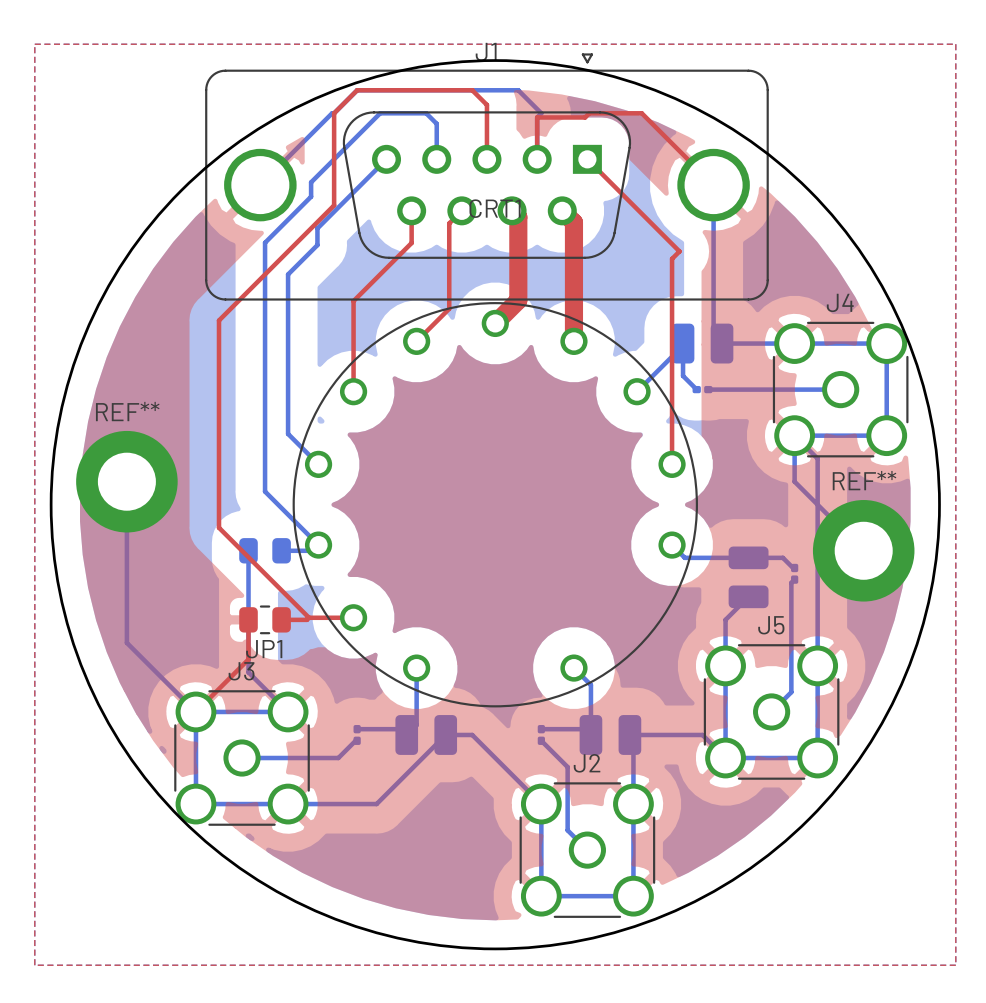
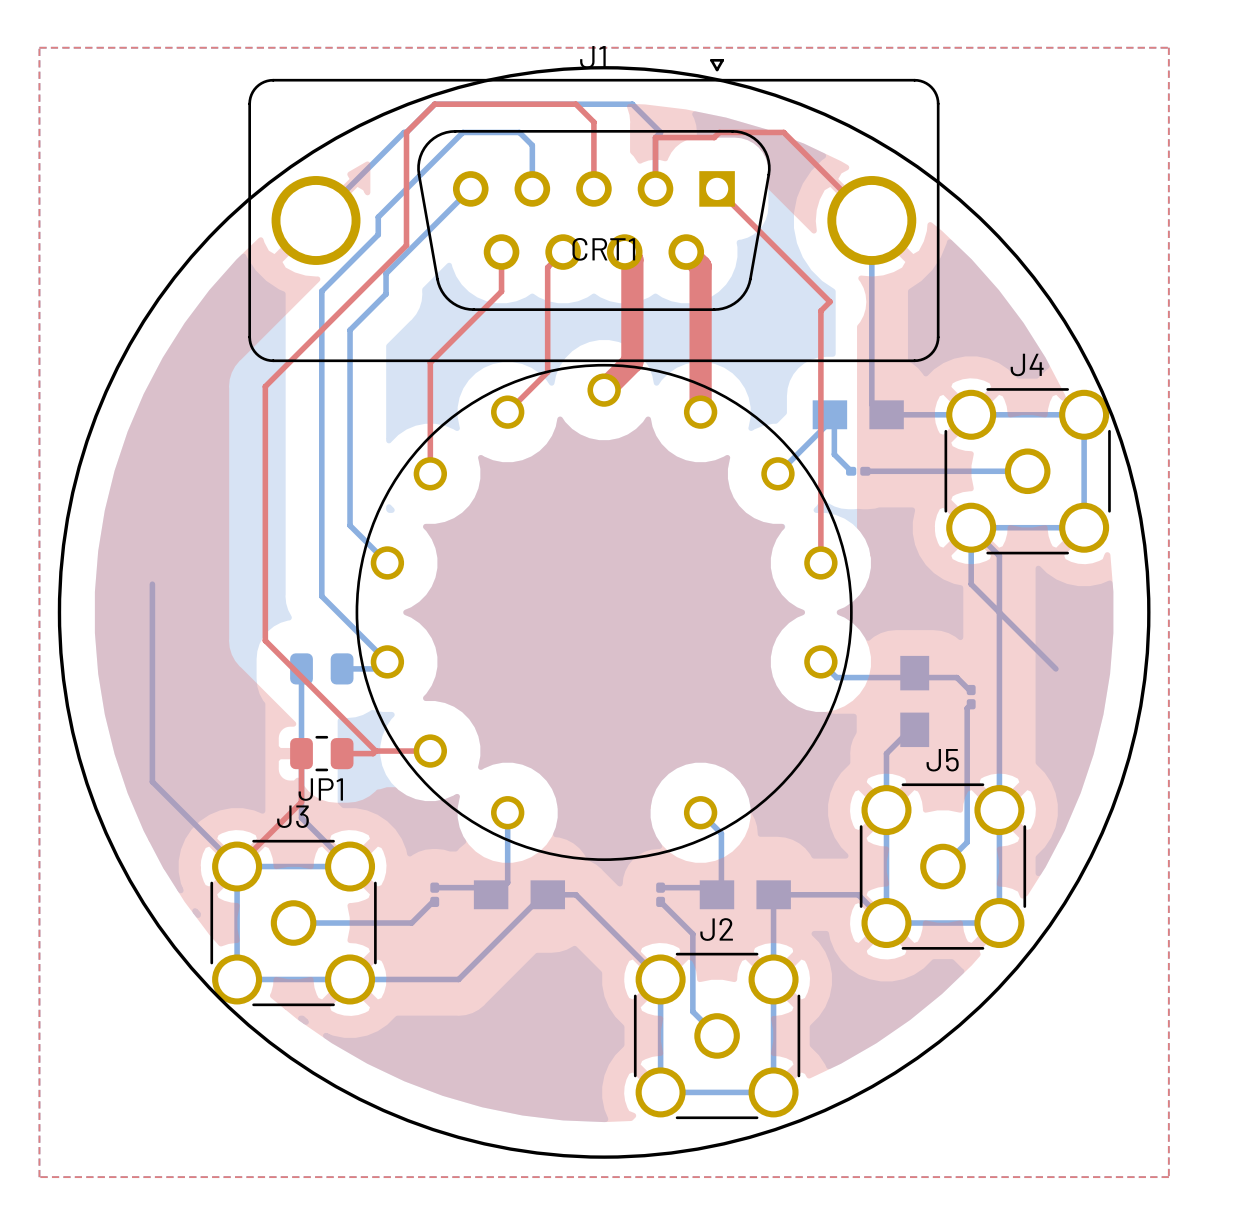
part footprint: [671, 323, 734, 364] -> [812, 400, 904, 430]
REF**: (126, 481) -> none
part footprint: [728, 546, 769, 609] -> [900, 655, 930, 748]
REF**: (863, 550) -> none
part footprint: [395, 715, 458, 755] -> [473, 880, 566, 910]
part footprint: [579, 715, 642, 755] -> [699, 880, 791, 910]

